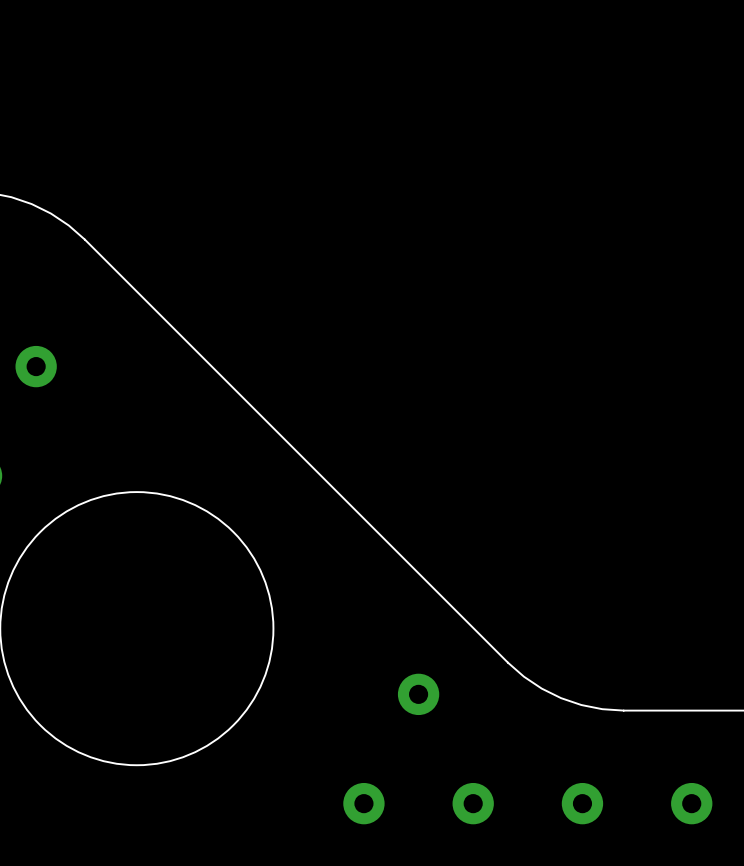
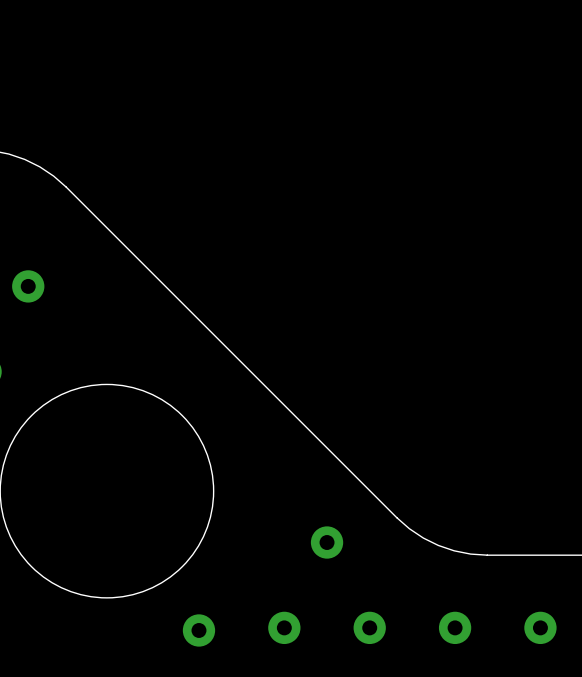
via: none -> (198, 630)

